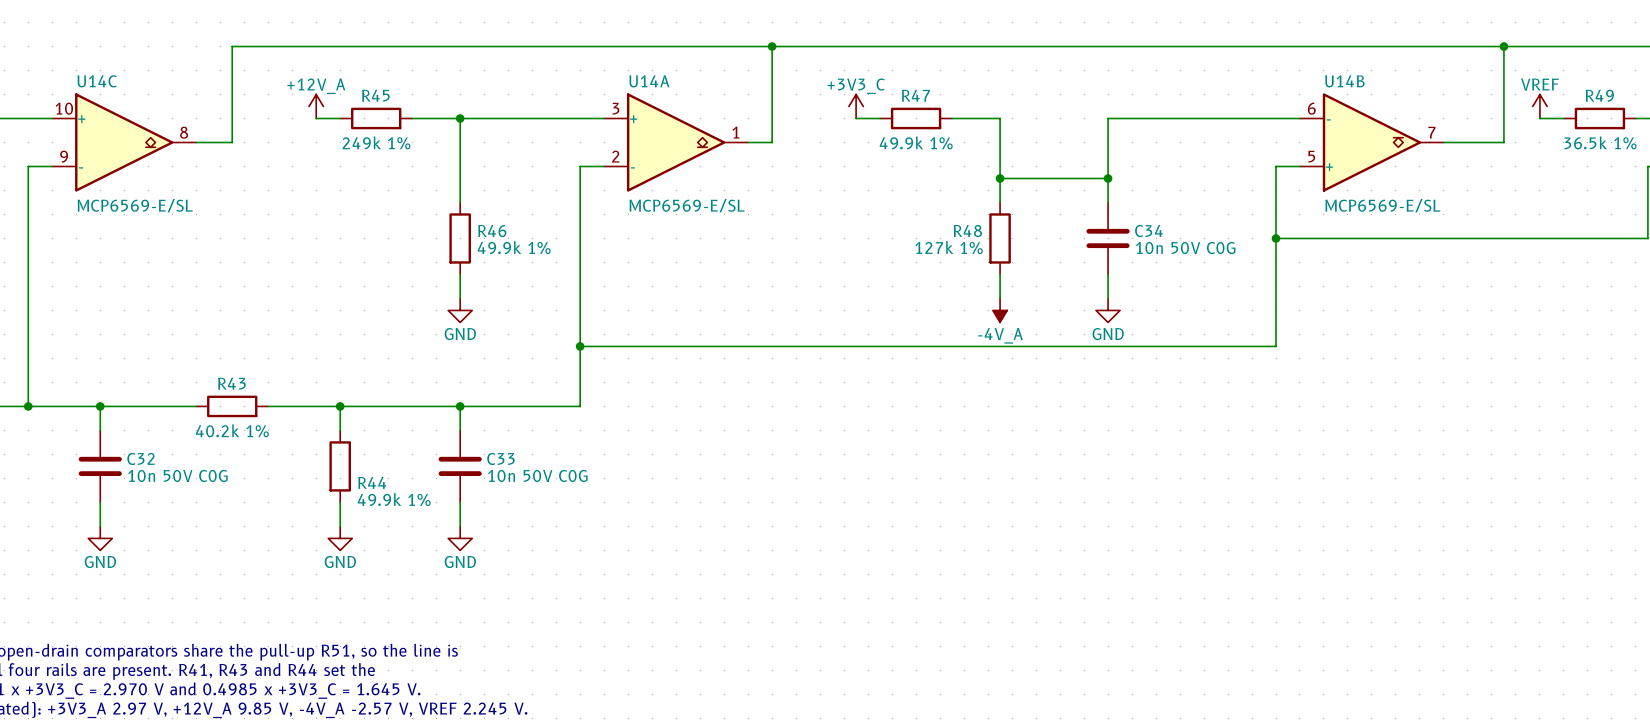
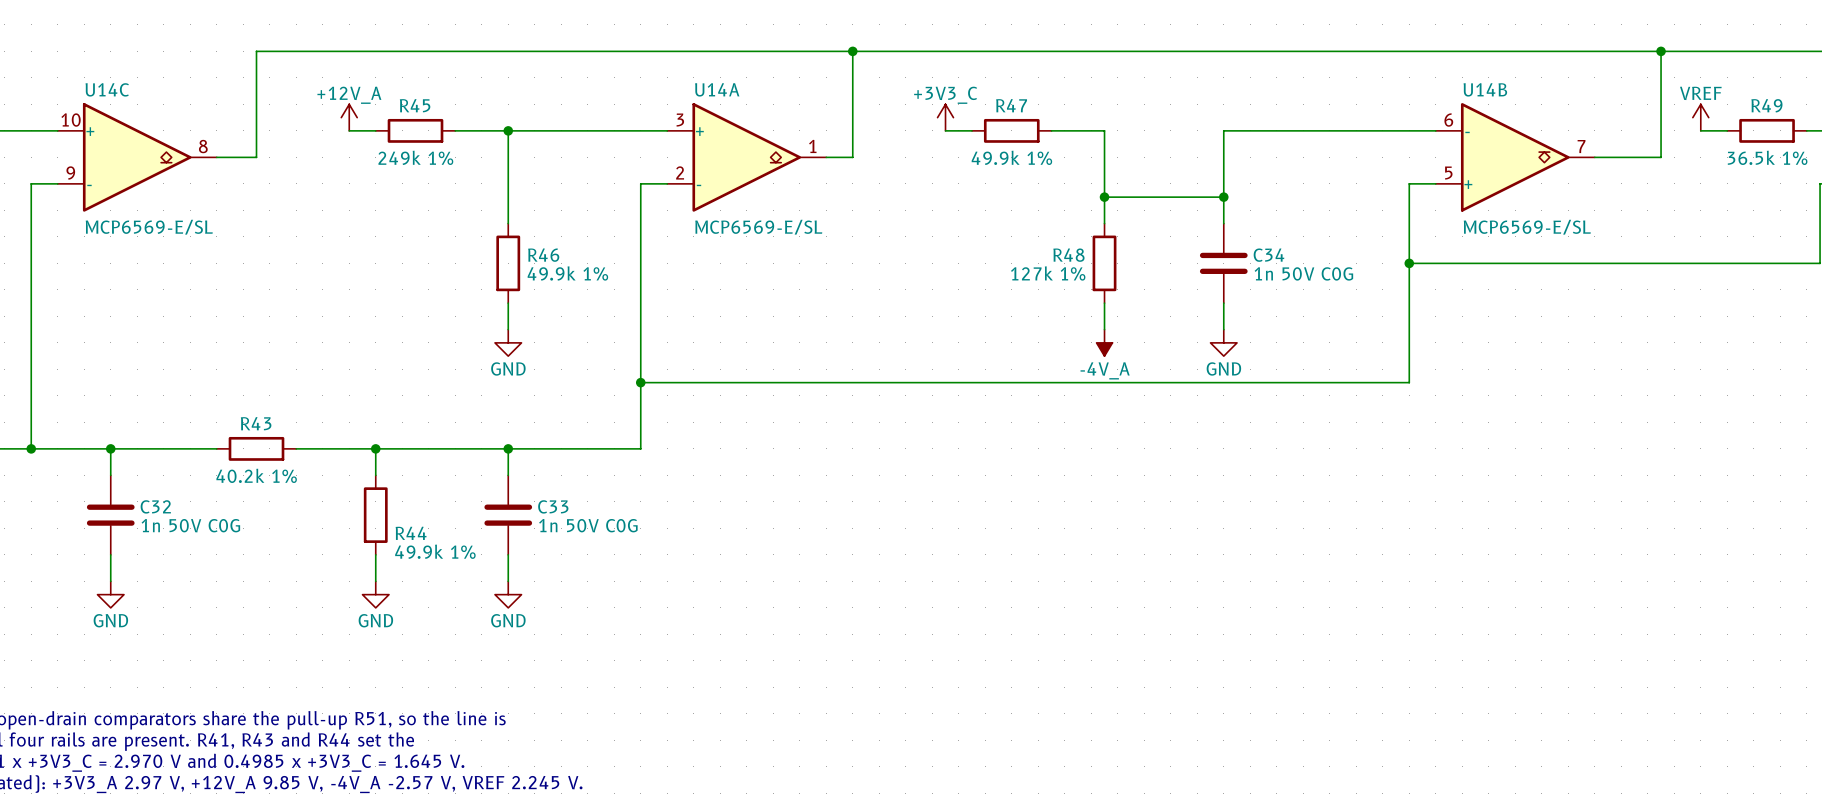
C34 value: 10n 50V C0G (1185, 248) -> 1n 50V C0G (1303, 273)
C32 value: 10n 50V C0G (177, 475) -> 1n 50V C0G (190, 525)
C33 value: 10n 50V C0G (537, 475) -> 1n 50V C0G (588, 525)

